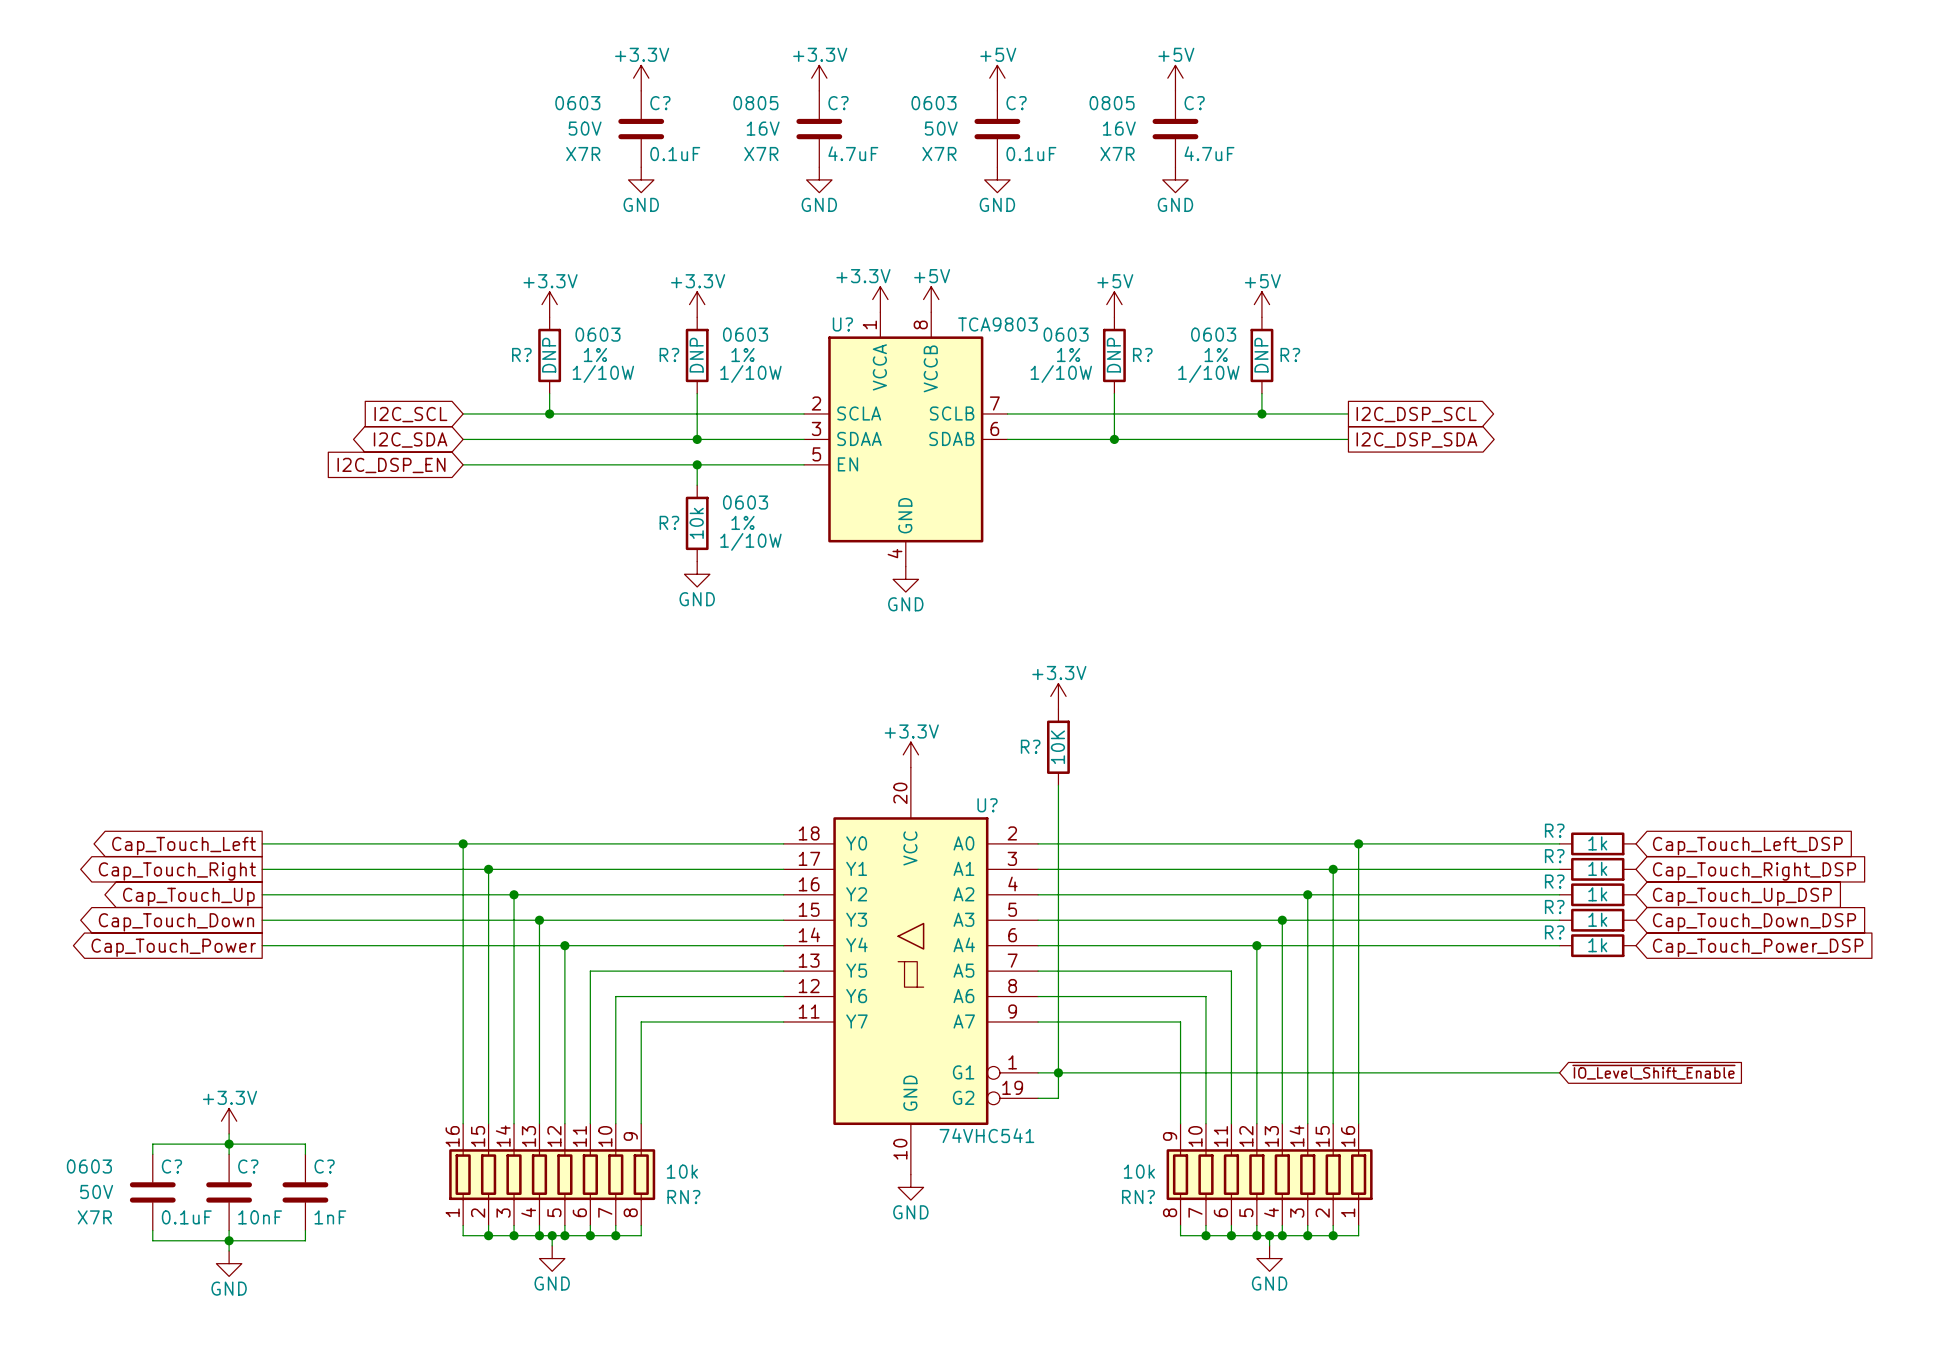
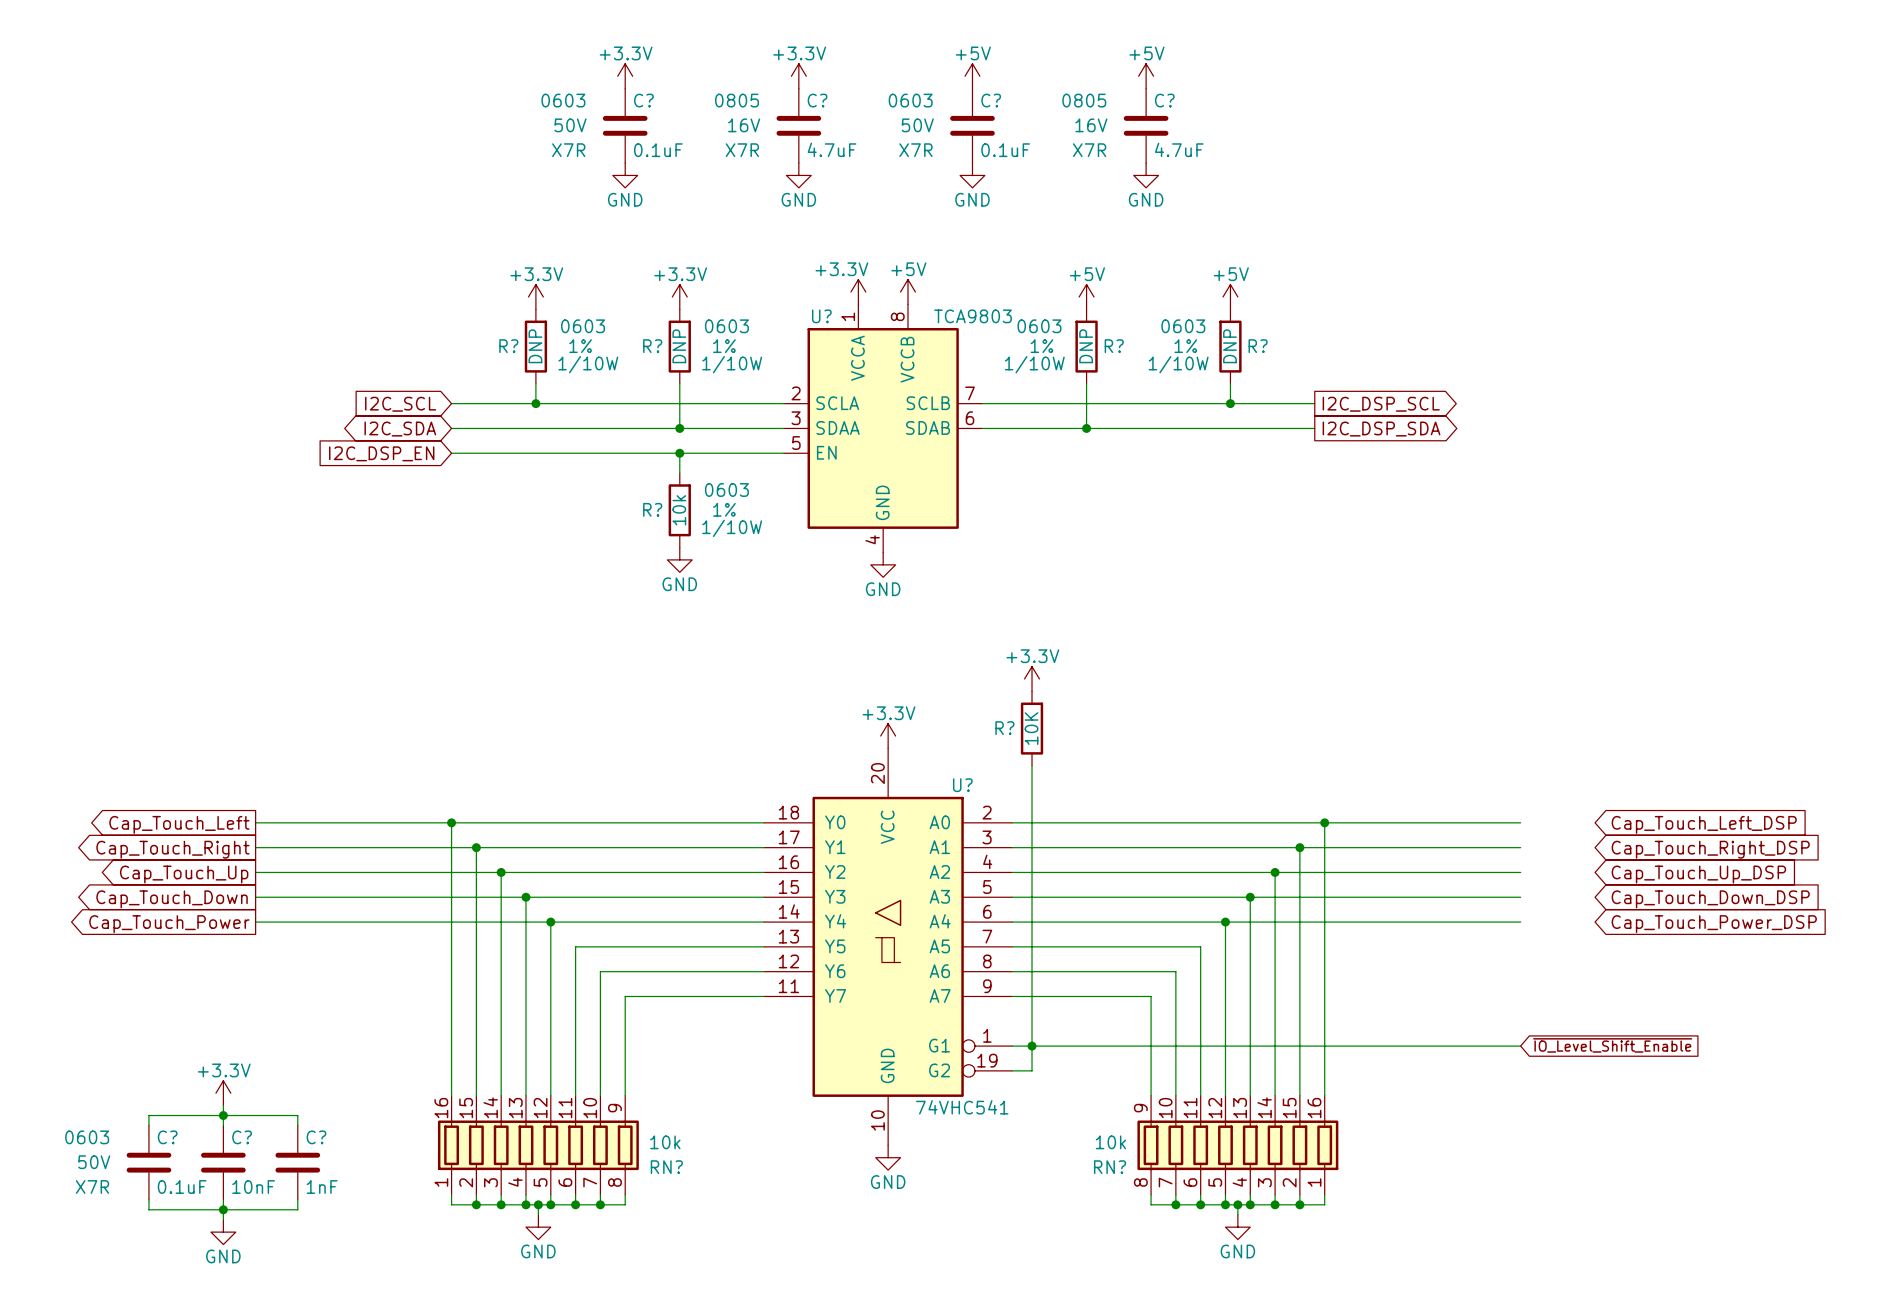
R?: 1k (1597, 843) -> none
R?: 1k (1597, 869) -> none
R?: 1k (1597, 894) -> none
R?: 1k (1597, 920) -> none
R?: 1k (1597, 945) -> none

